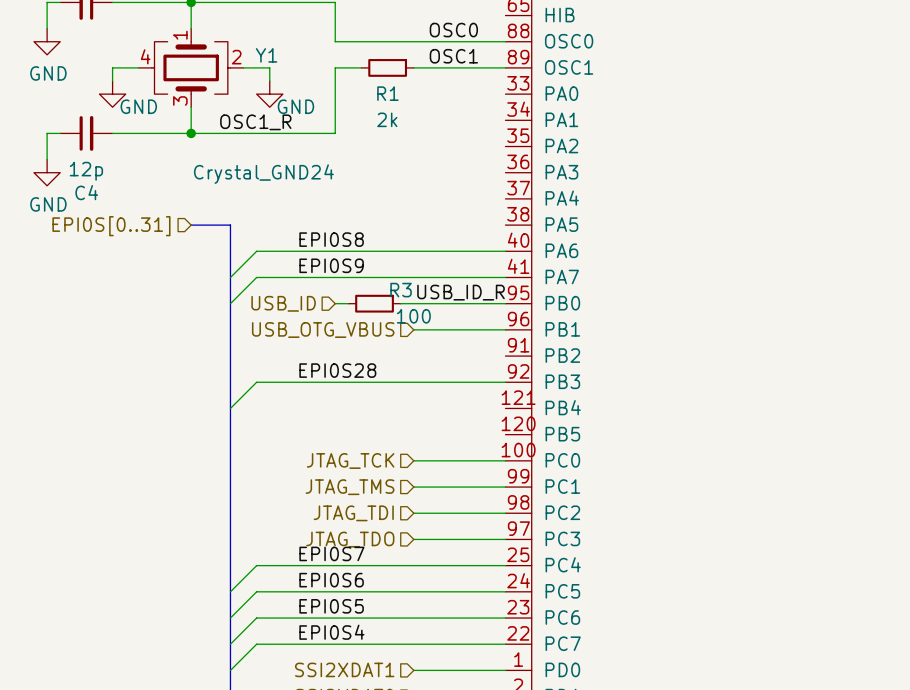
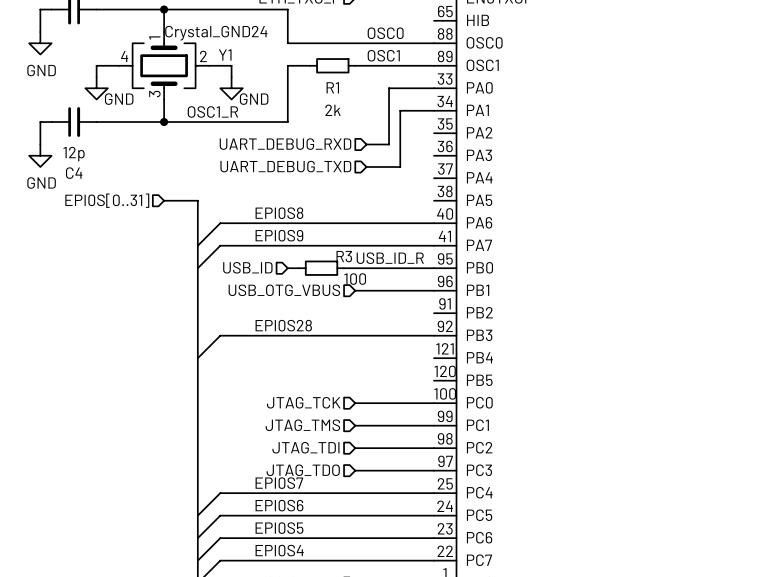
wire: none -> (434, 88) (389, 88) (389, 144) (366, 144)
wire: none -> (434, 110) (400, 110) (400, 166) (366, 166)
hierarchical label: none -> UART_DEBUG_RXD (285, 144)
Y1 value position: Crystal_GND24 (263, 174) -> Crystal_GND24 (216, 33)
hierarchical label: none -> UART_DEBUG_TXD (285, 166)

